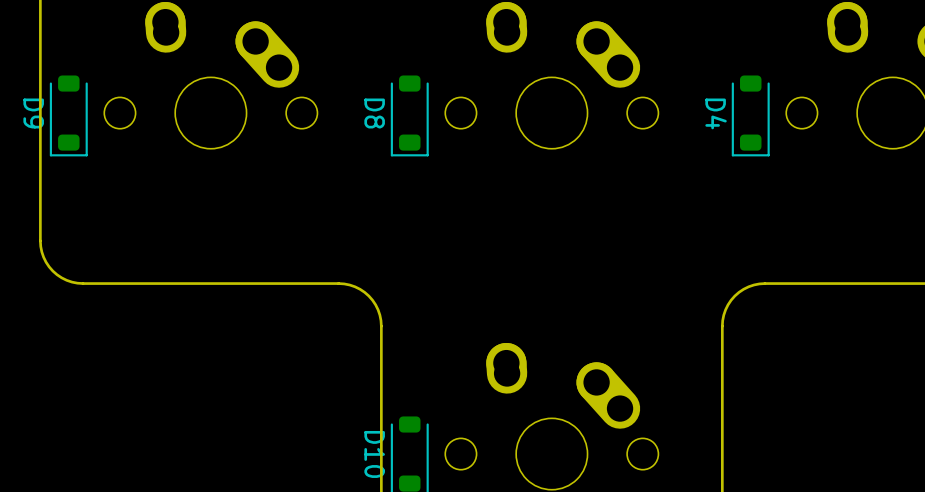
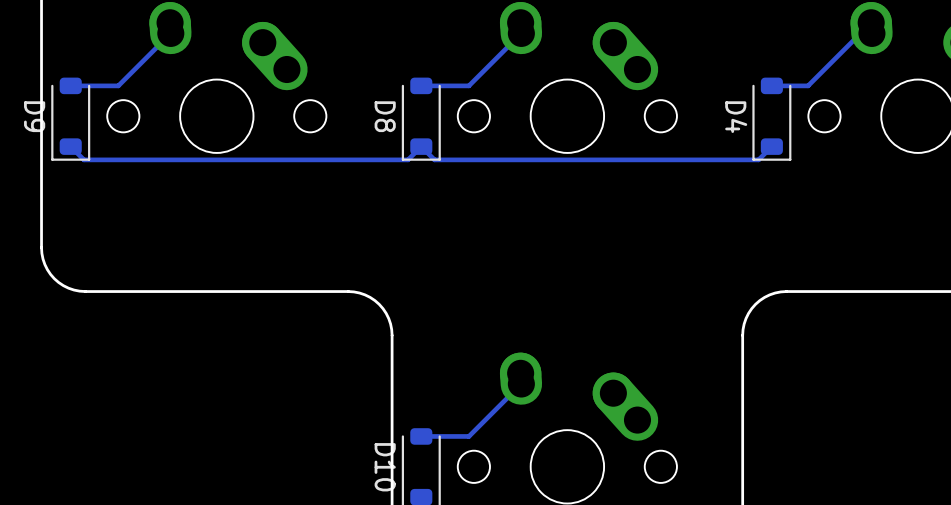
track: none -> (871, 22) (808, 85) (771, 85)
track: none -> (170, 33) (118, 85) (70, 85)
track: none -> (521, 33) (468, 85) (421, 85)
track: none -> (771, 146) (758, 159) (434, 159) (421, 146) (408, 159) (84, 159) (70, 146)
track: none -> (521, 384) (468, 436) (421, 436)

